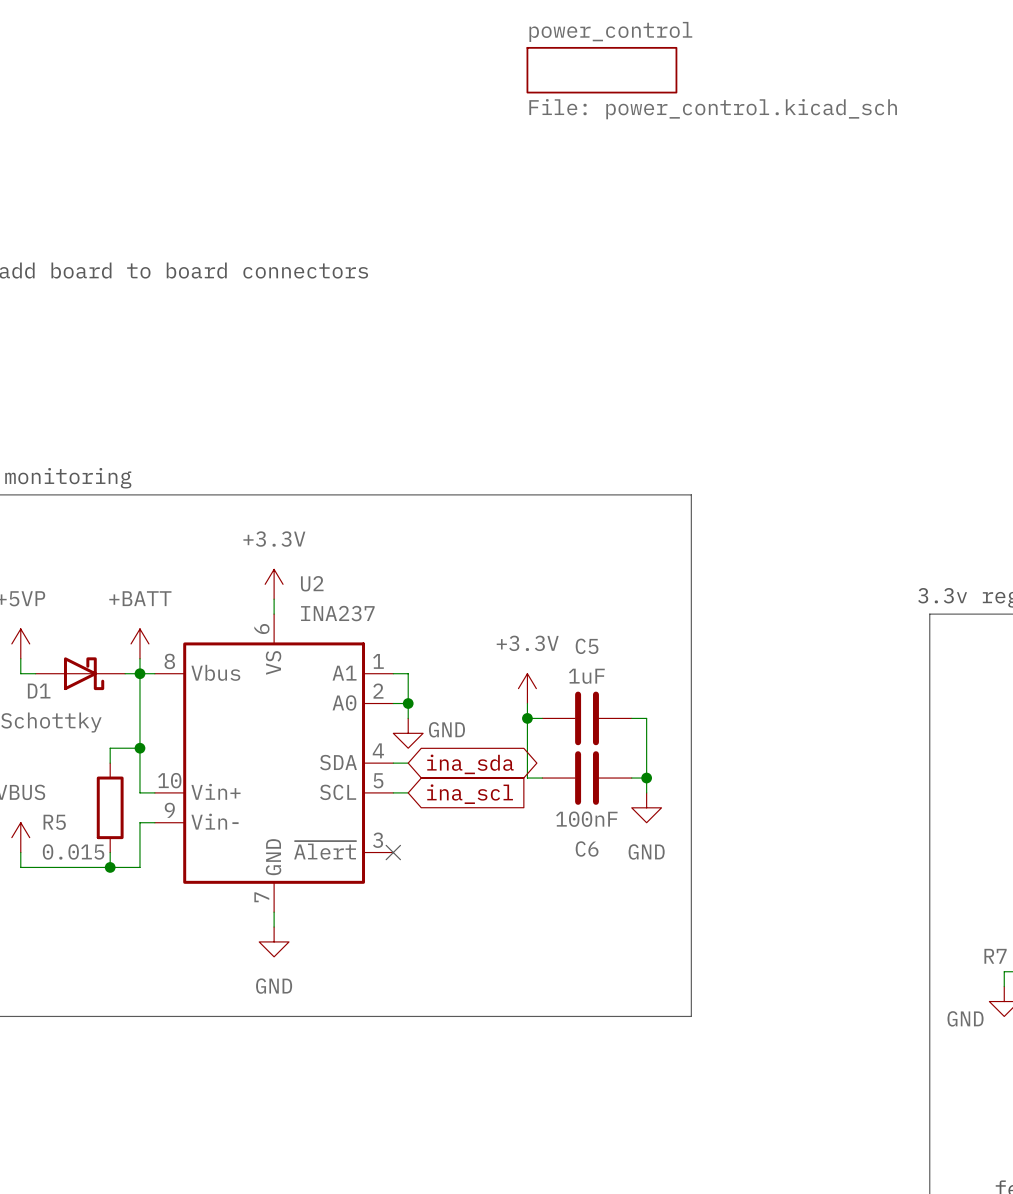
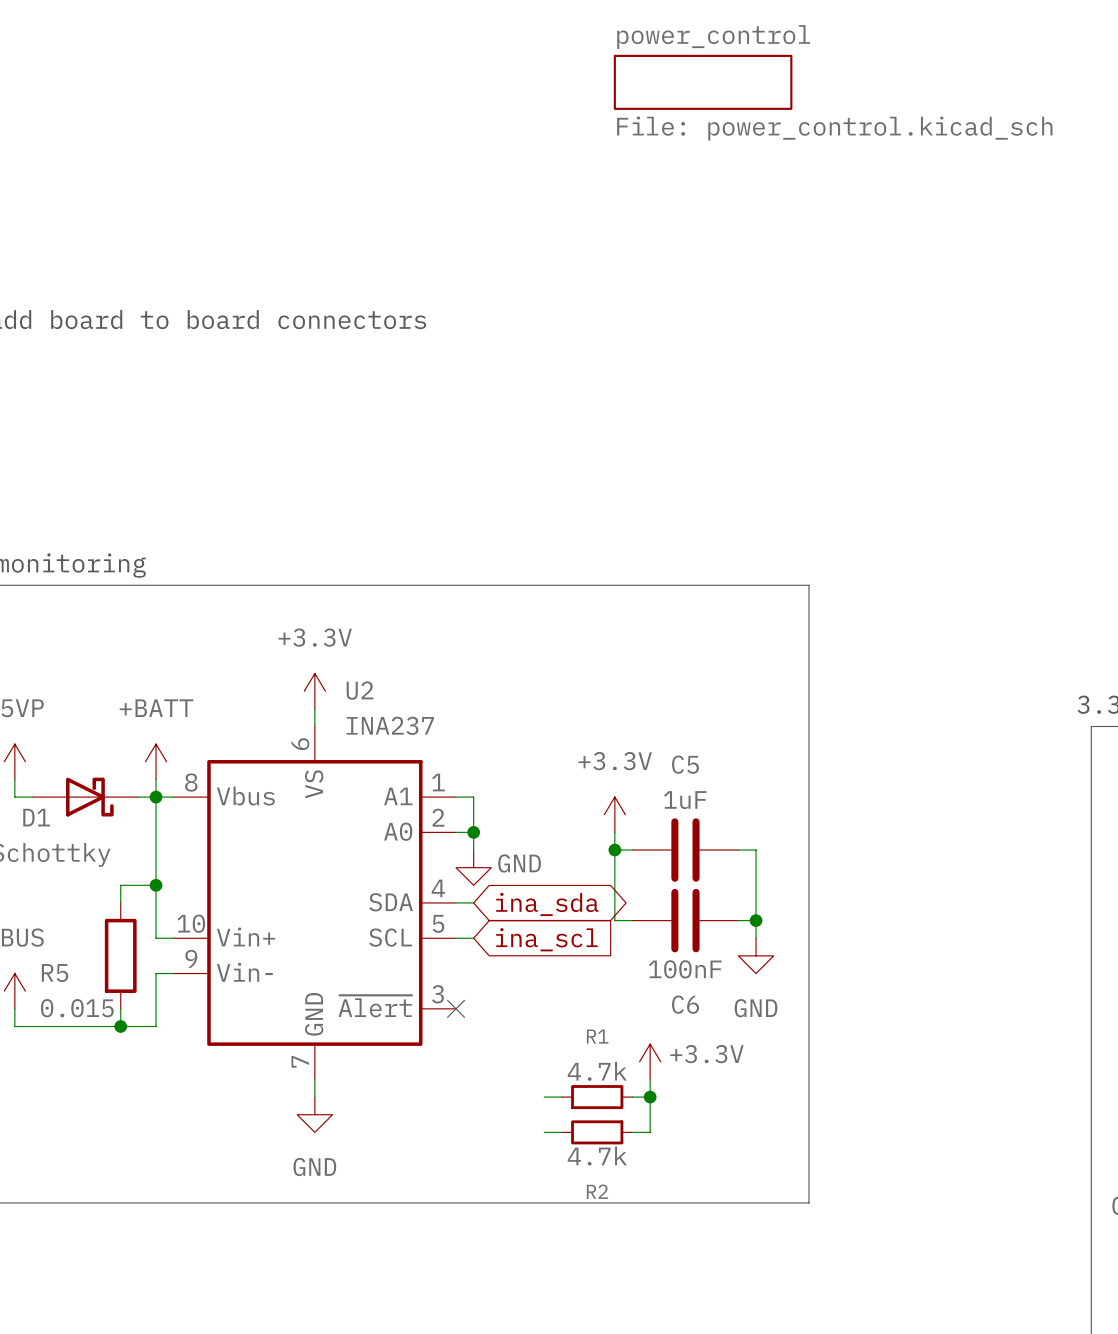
power symbol: none -> +3.3V (650, 1061)
wire: none -> (650, 1079) (650, 1132) (632, 1132)
wire: none -> (544, 1097) (561, 1097)
R1: none -> 4.7k (597, 1097)
wire: none -> (632, 1097) (650, 1097)
junction: none -> (650, 1097)
wire: none -> (544, 1132) (561, 1132)
R2: none -> 4.7k (597, 1132)

